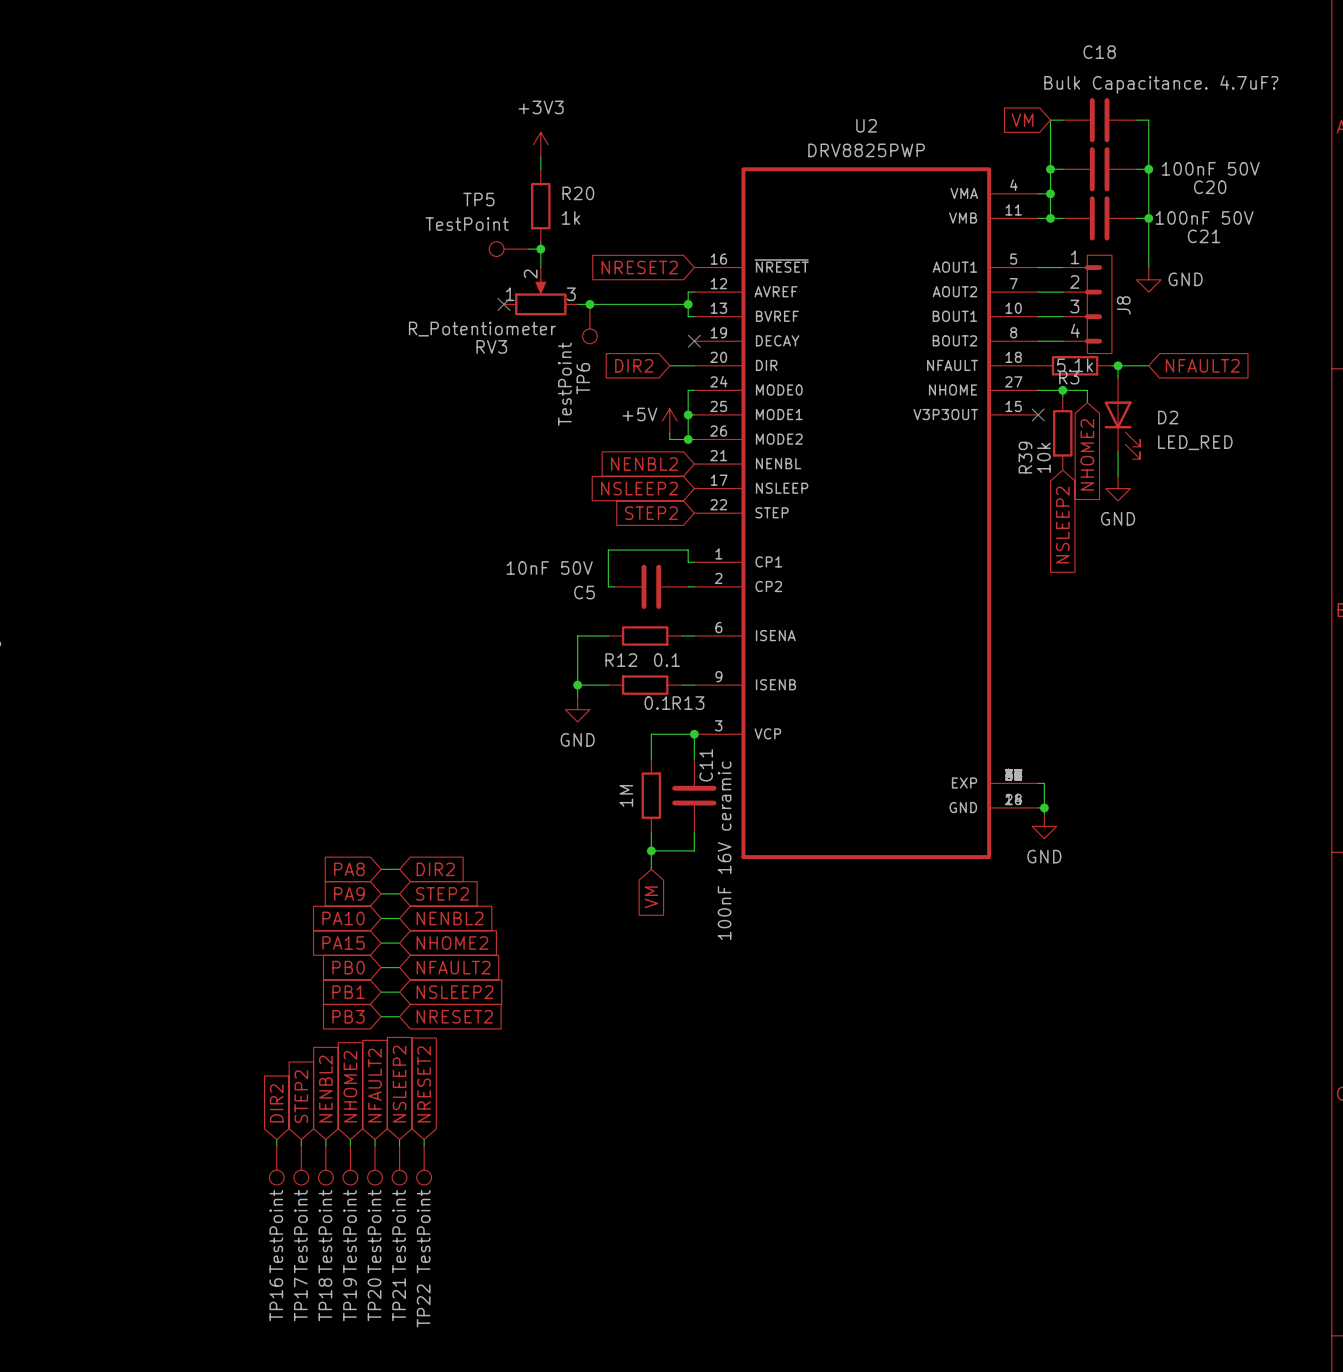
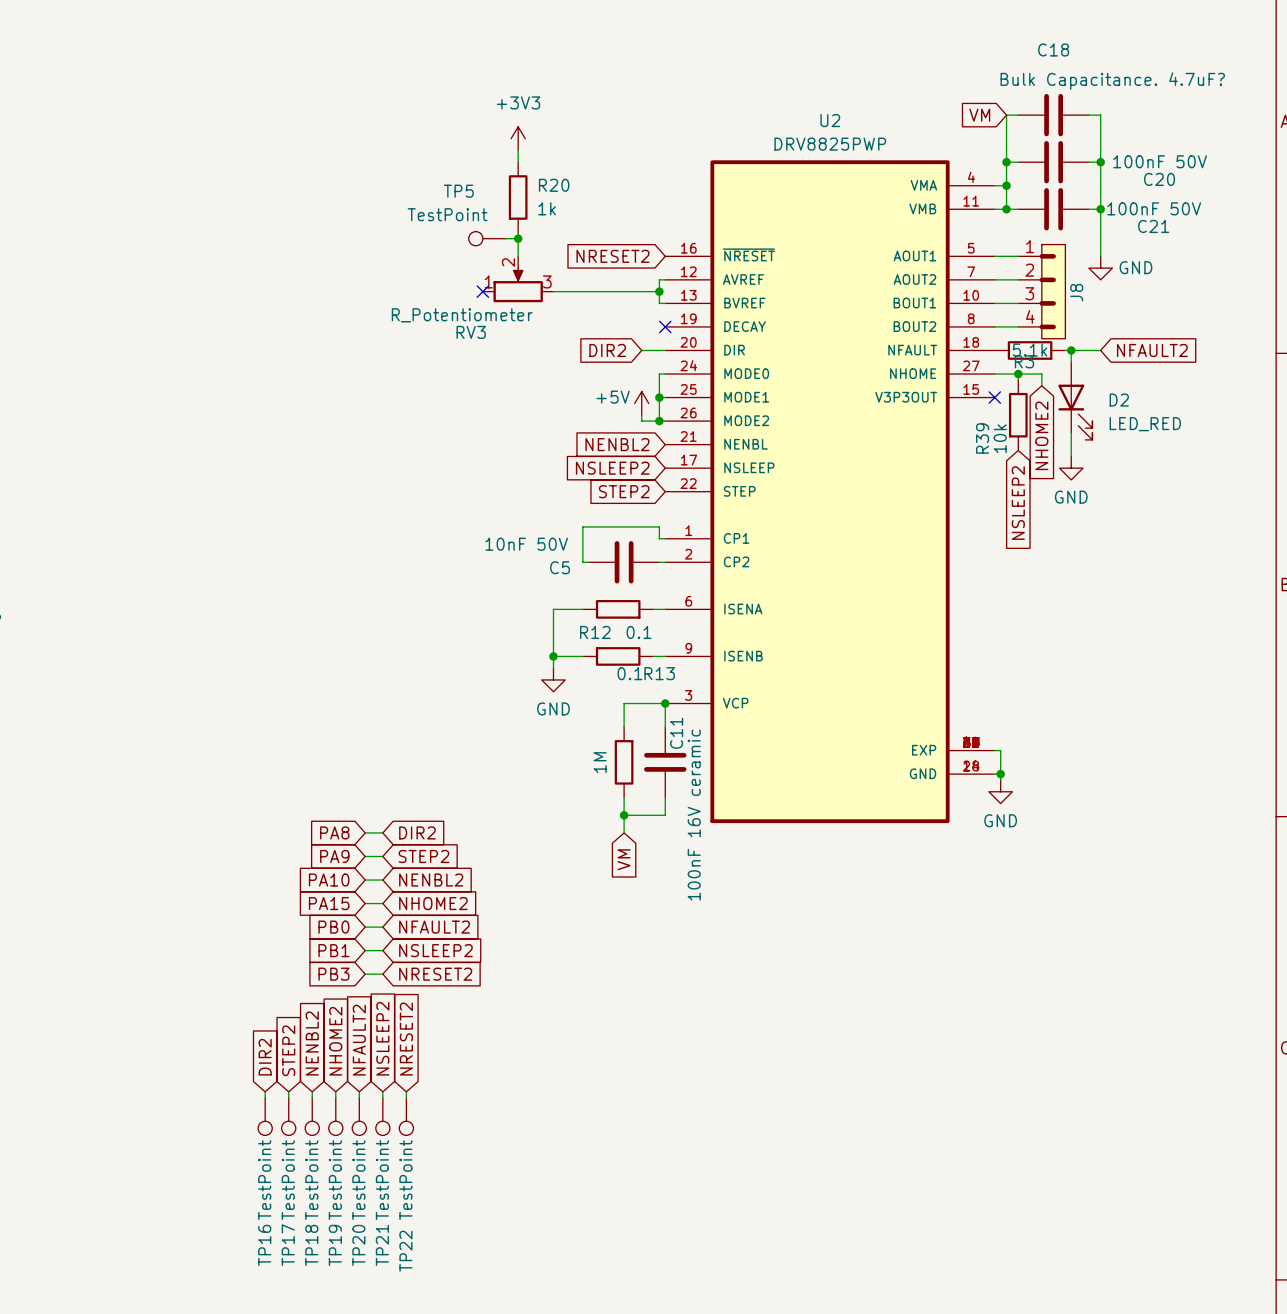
junction: (589, 304) -> none
TP6: TestPoint (589, 324) -> none

